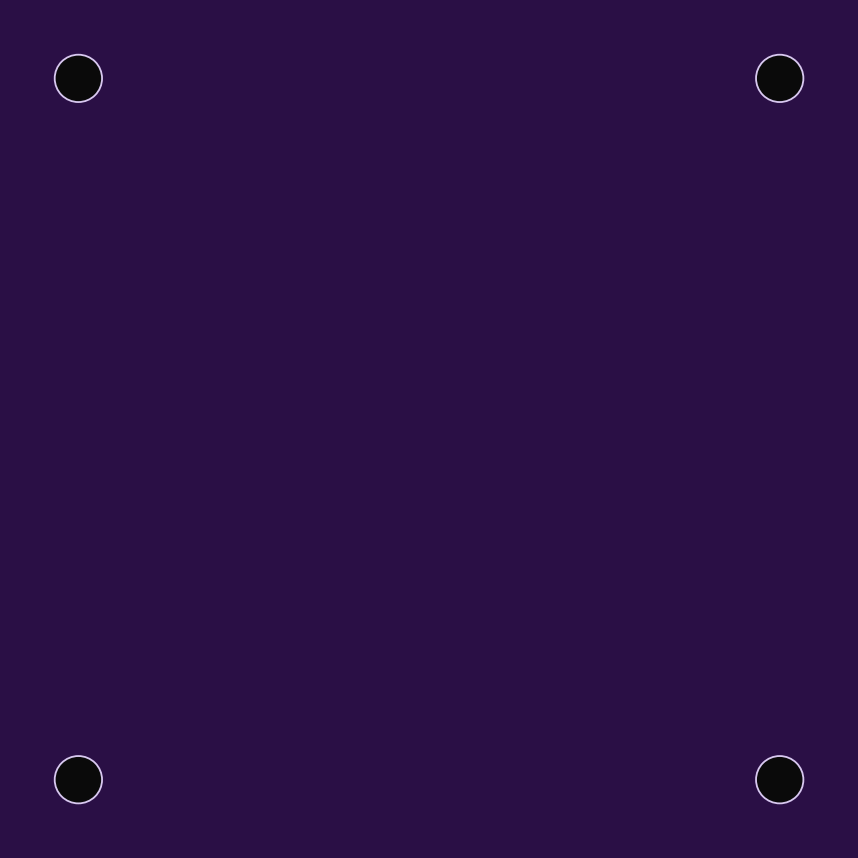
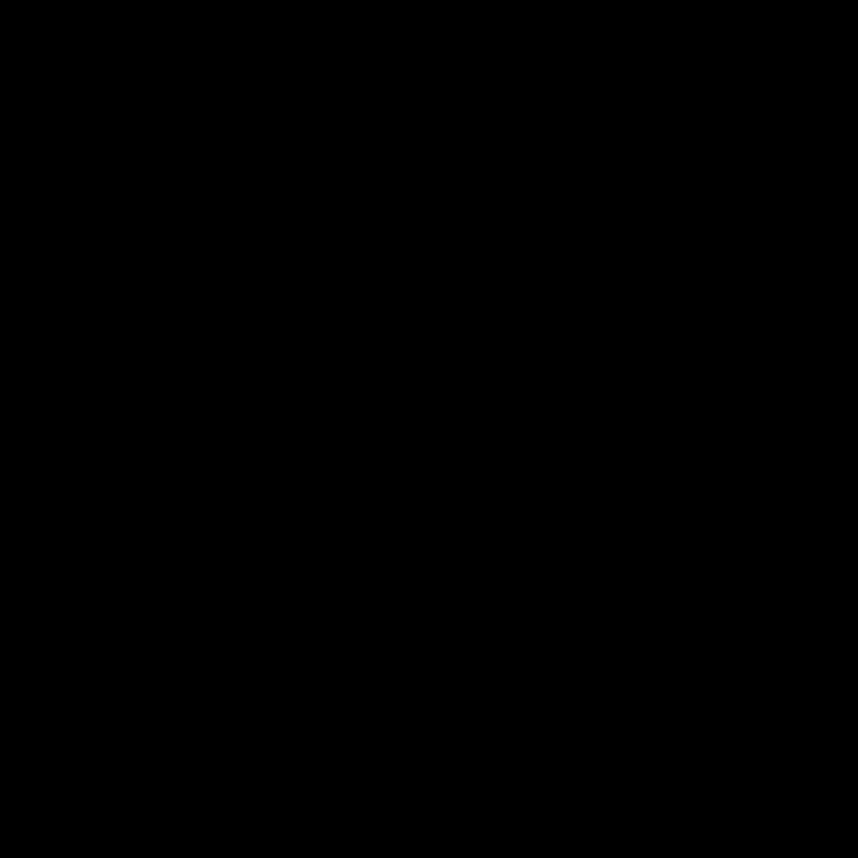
part: (78, 78) -> none
part: (779, 78) -> none
part: (78, 779) -> none
part: (779, 779) -> none

